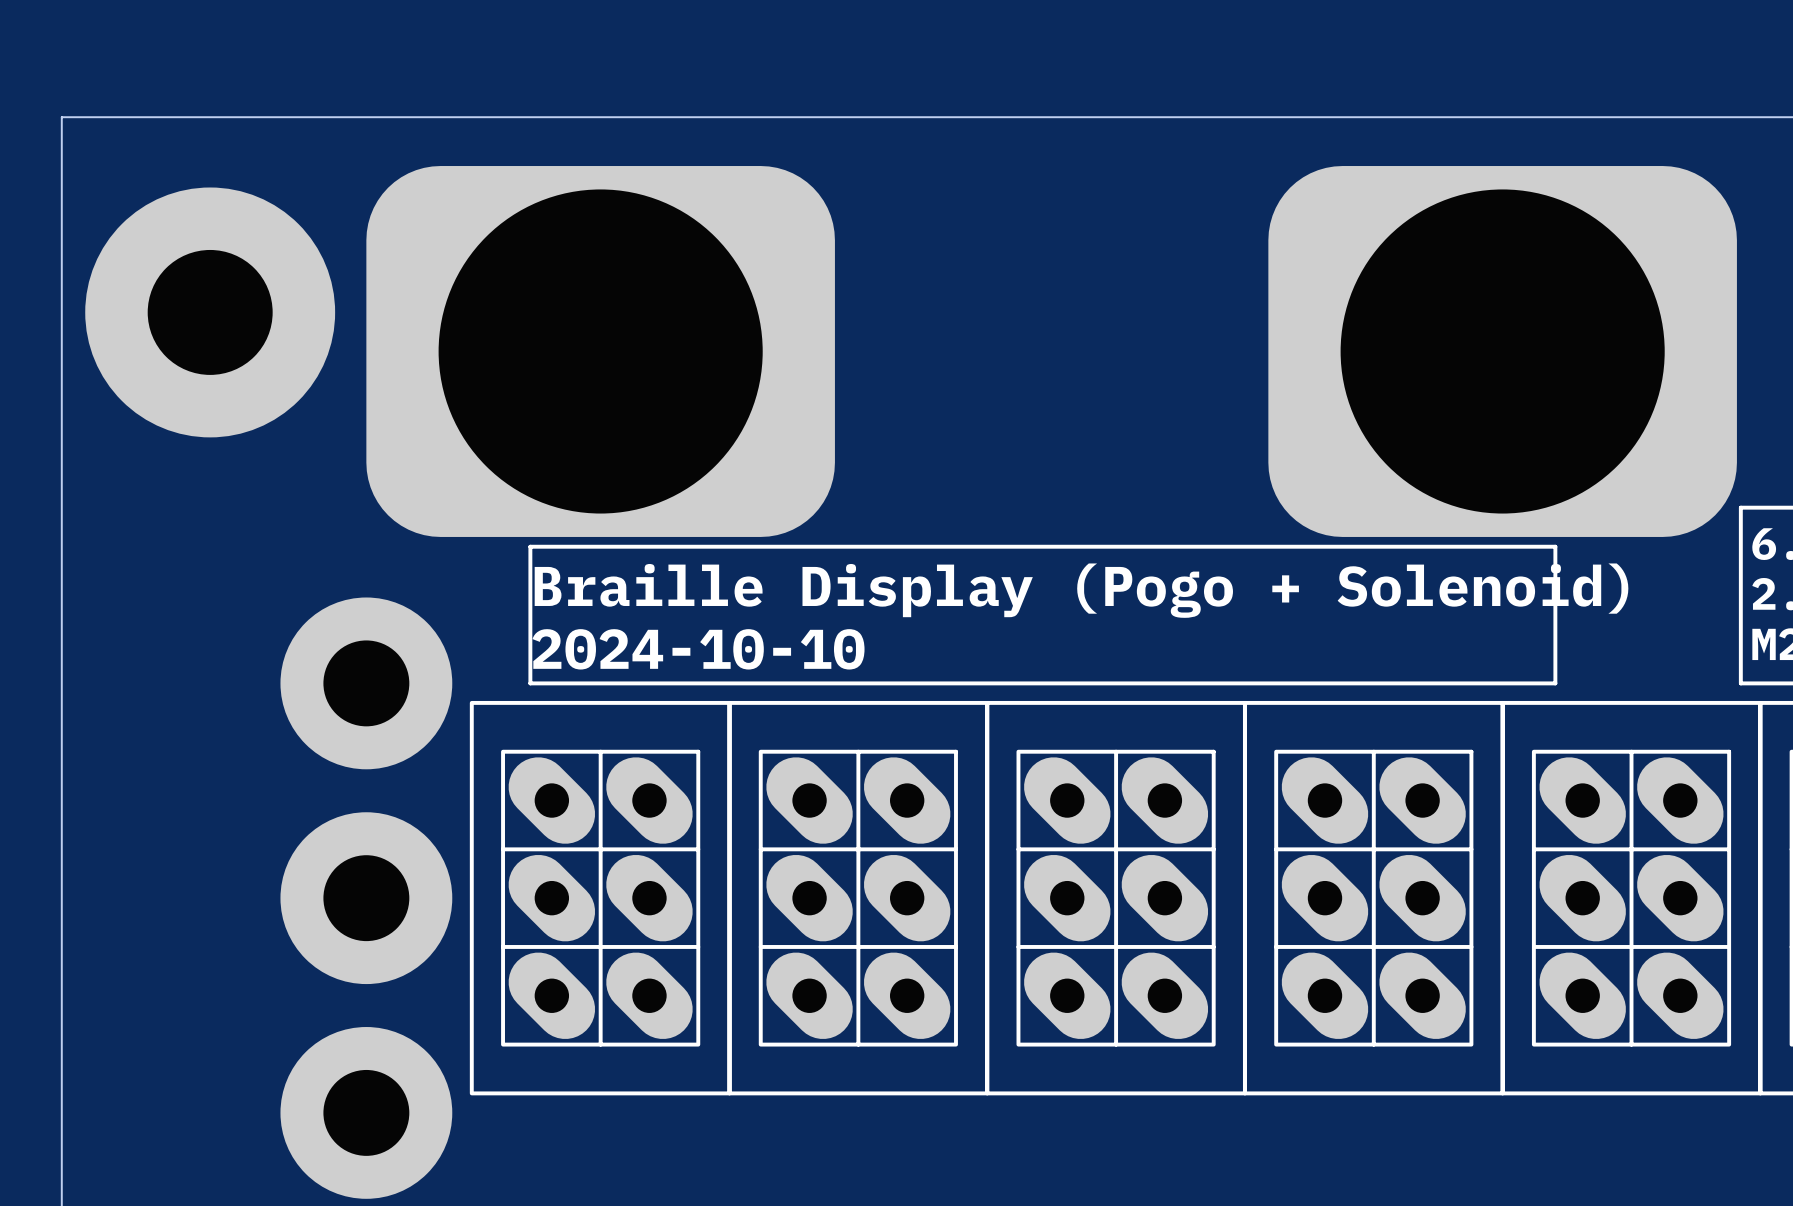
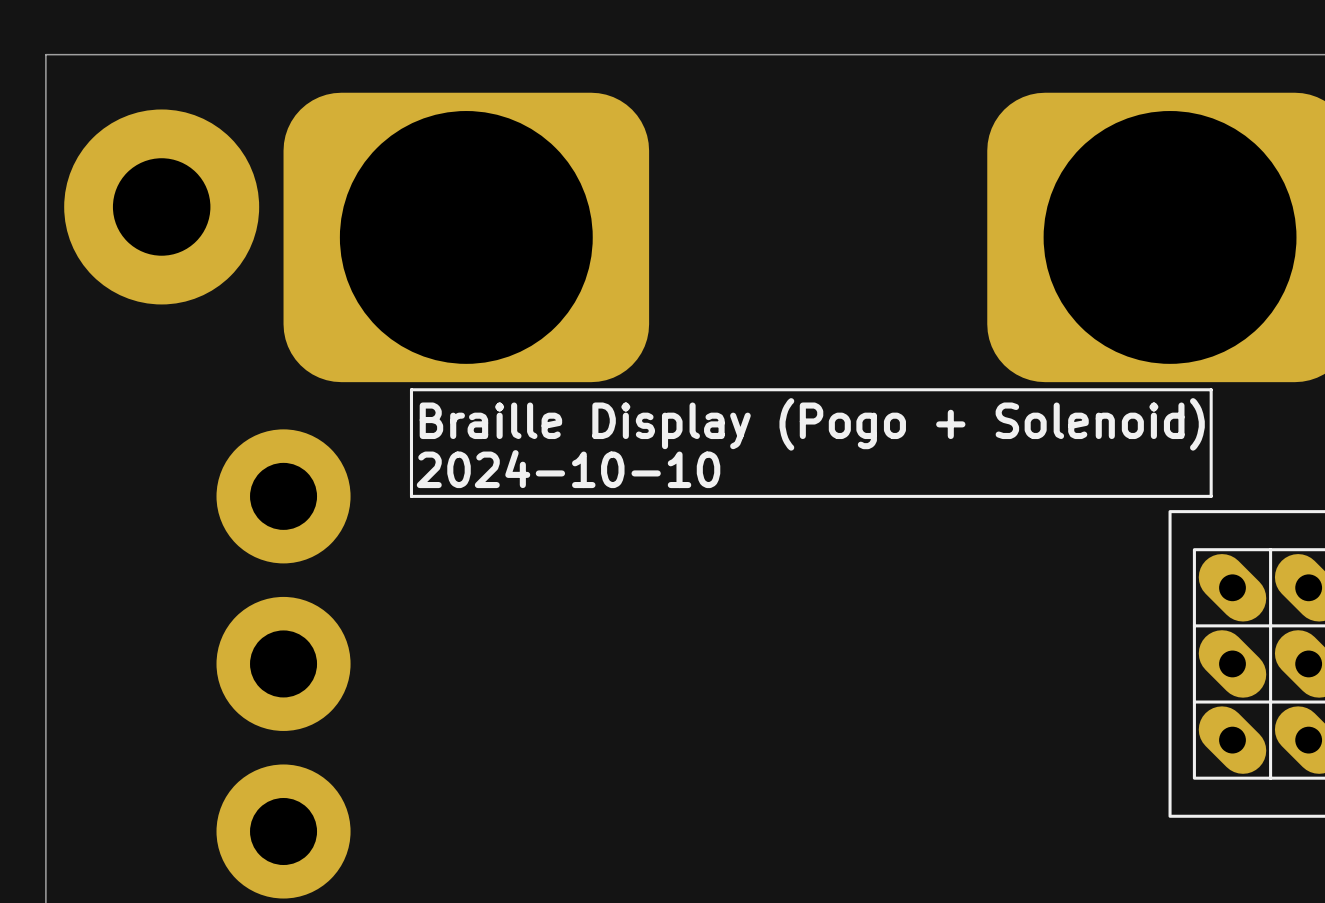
part: (600, 898) -> none
part: (858, 898) -> none
part: (1116, 898) -> none
part: (1373, 898) -> none

